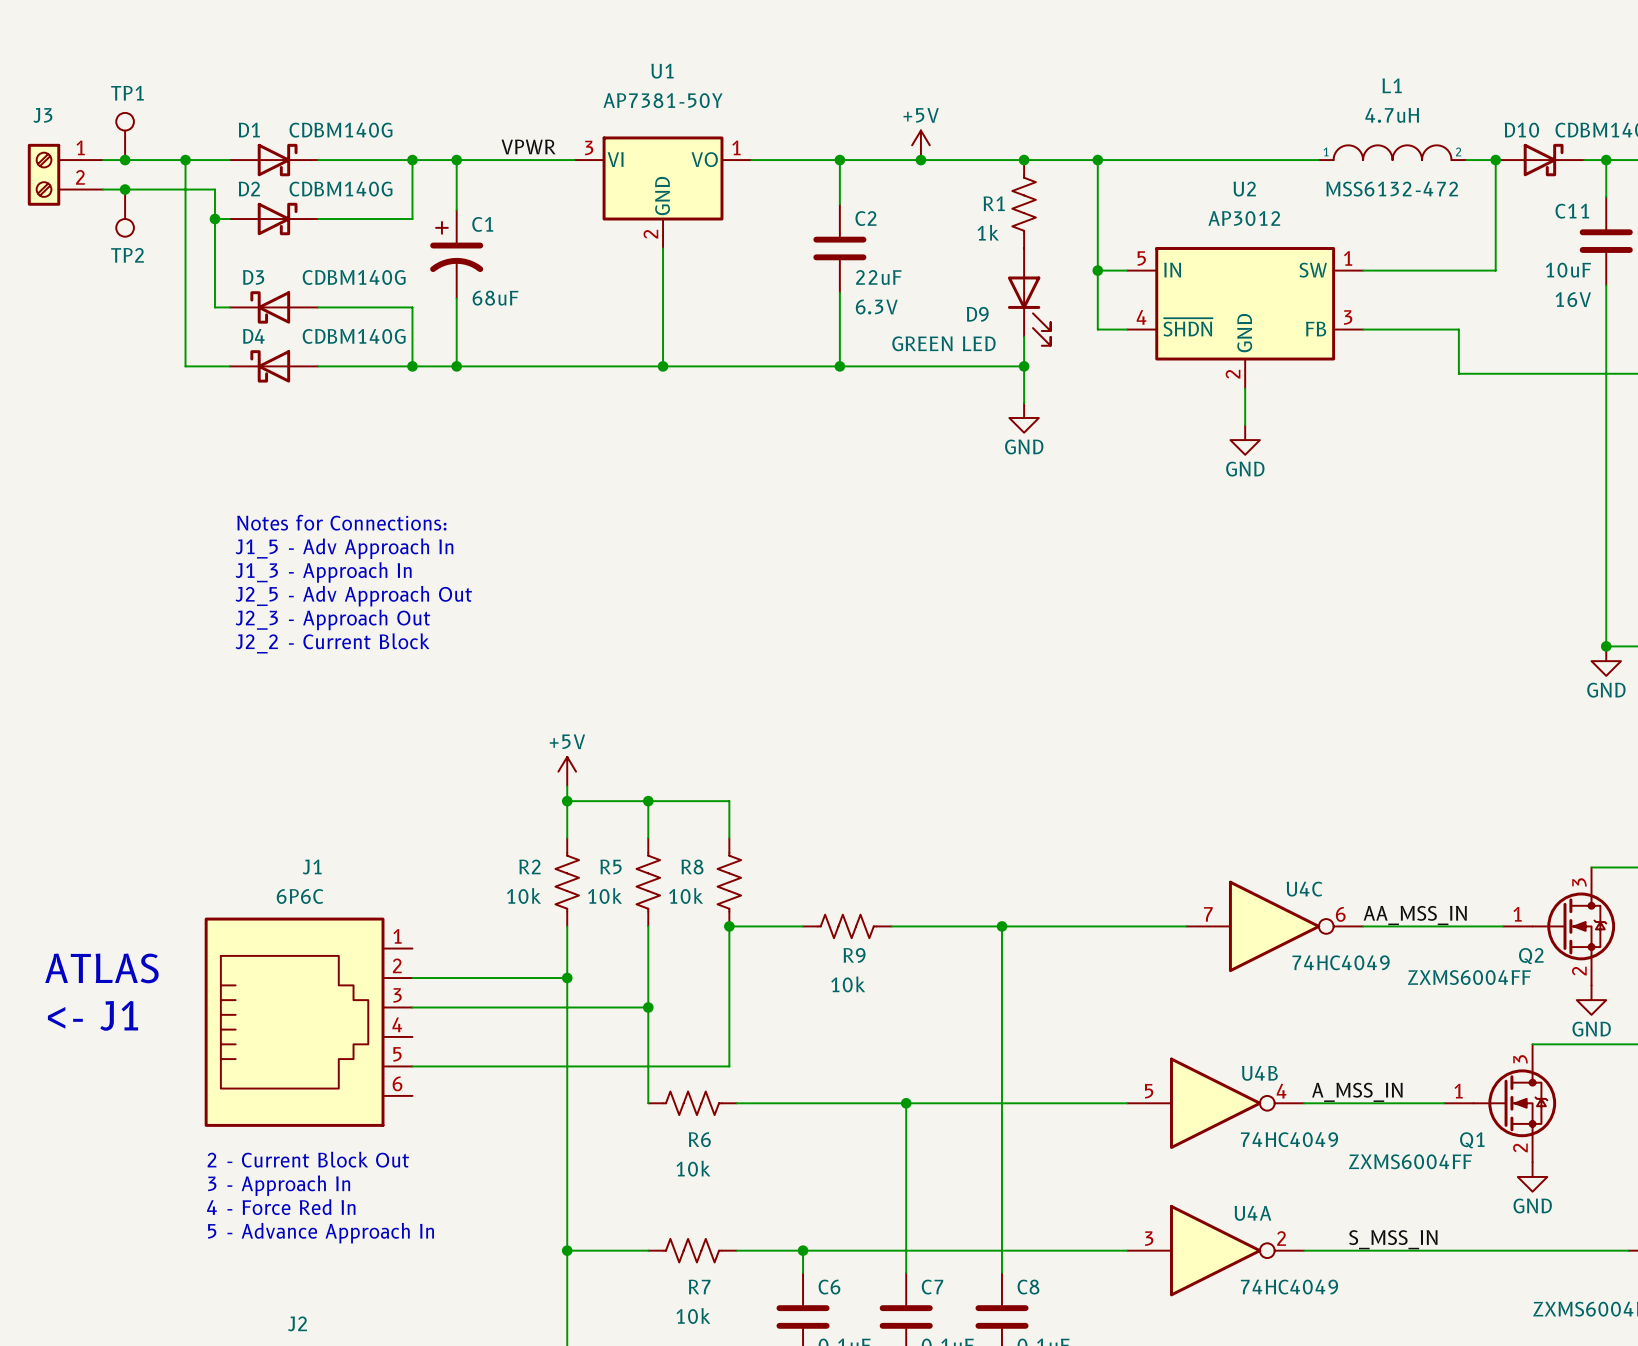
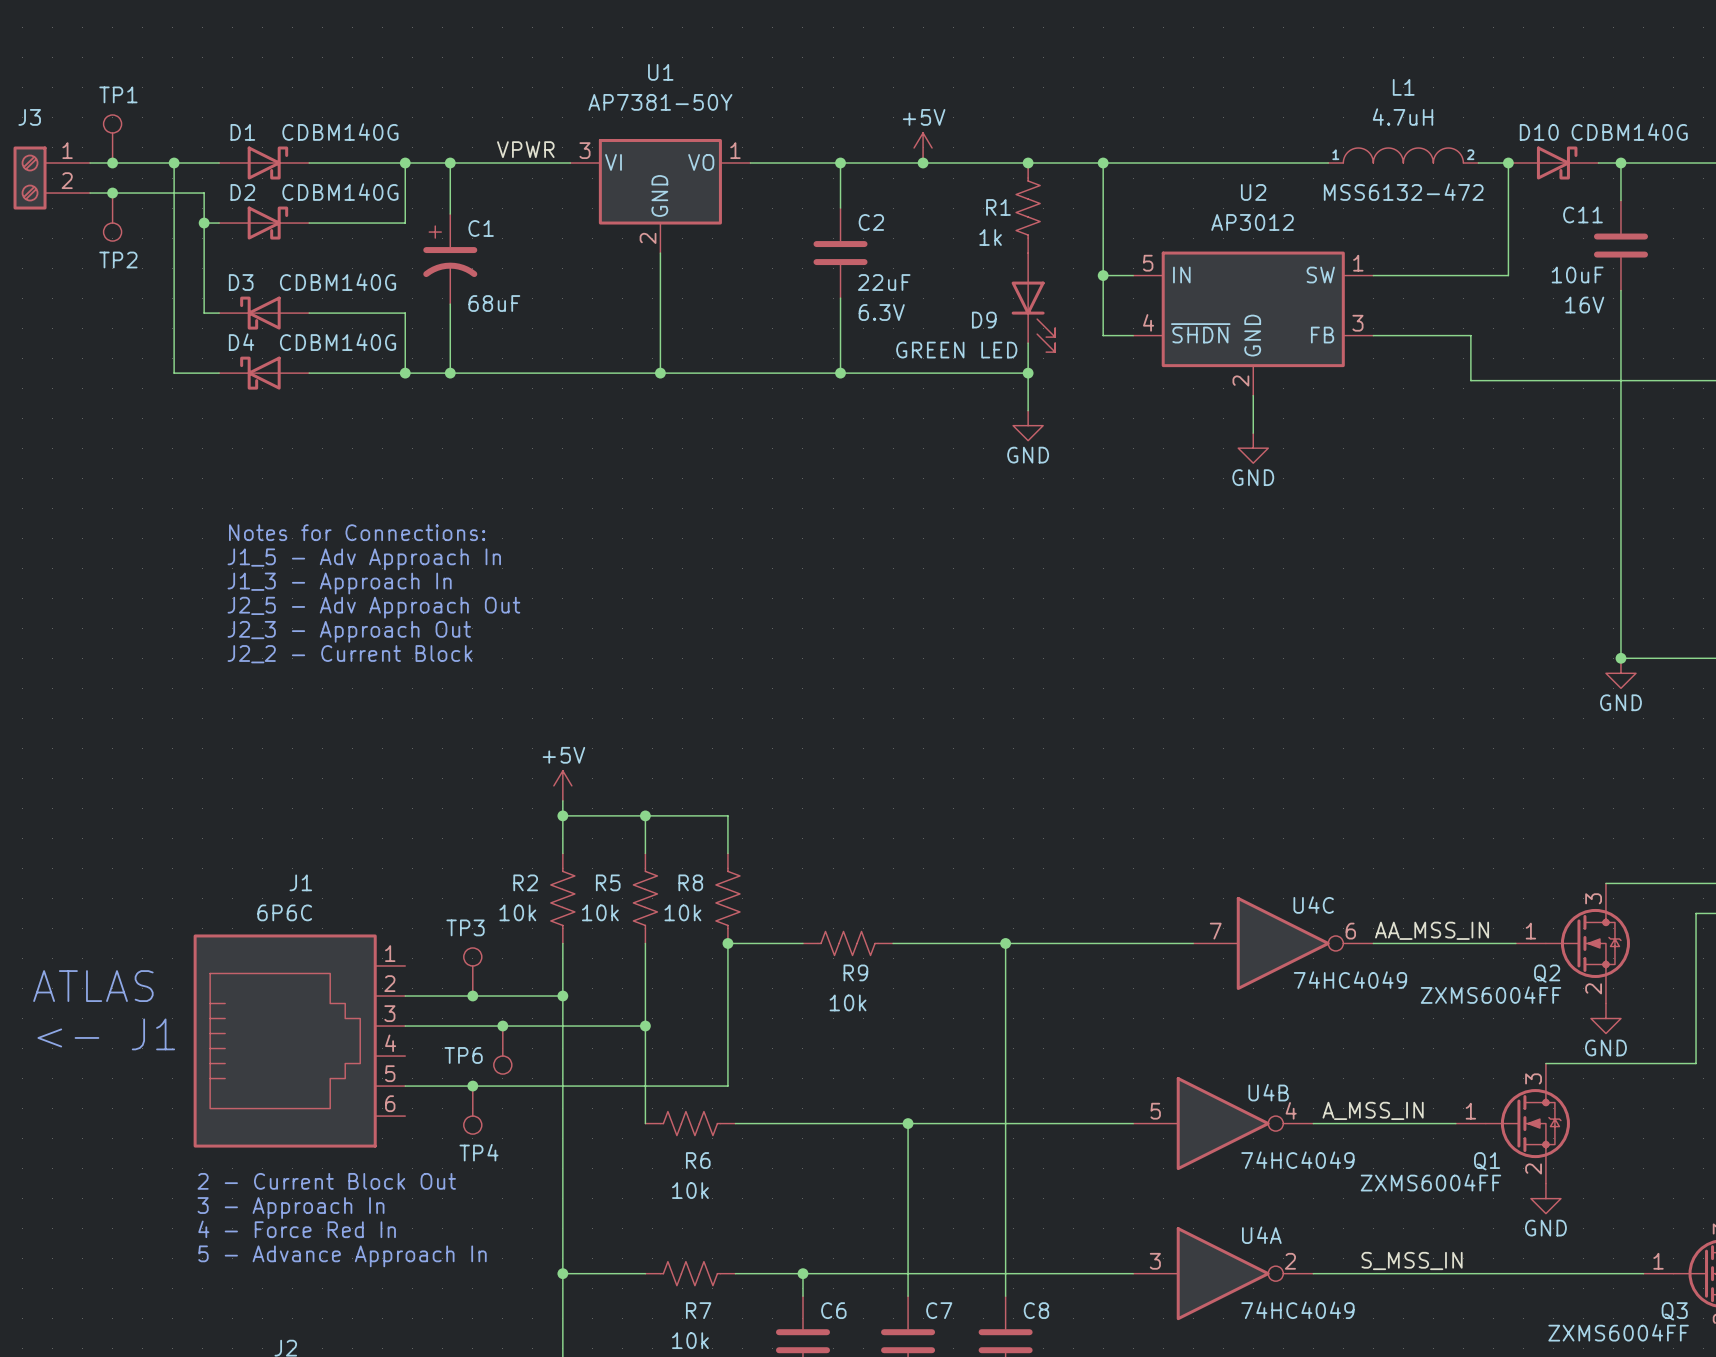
TP3: none -> (472, 971)
junction: none -> (472, 996)
junction: none -> (502, 1026)
TP6: none -> (502, 1050)
junction: none -> (472, 1086)
TP4: none -> (472, 1110)

